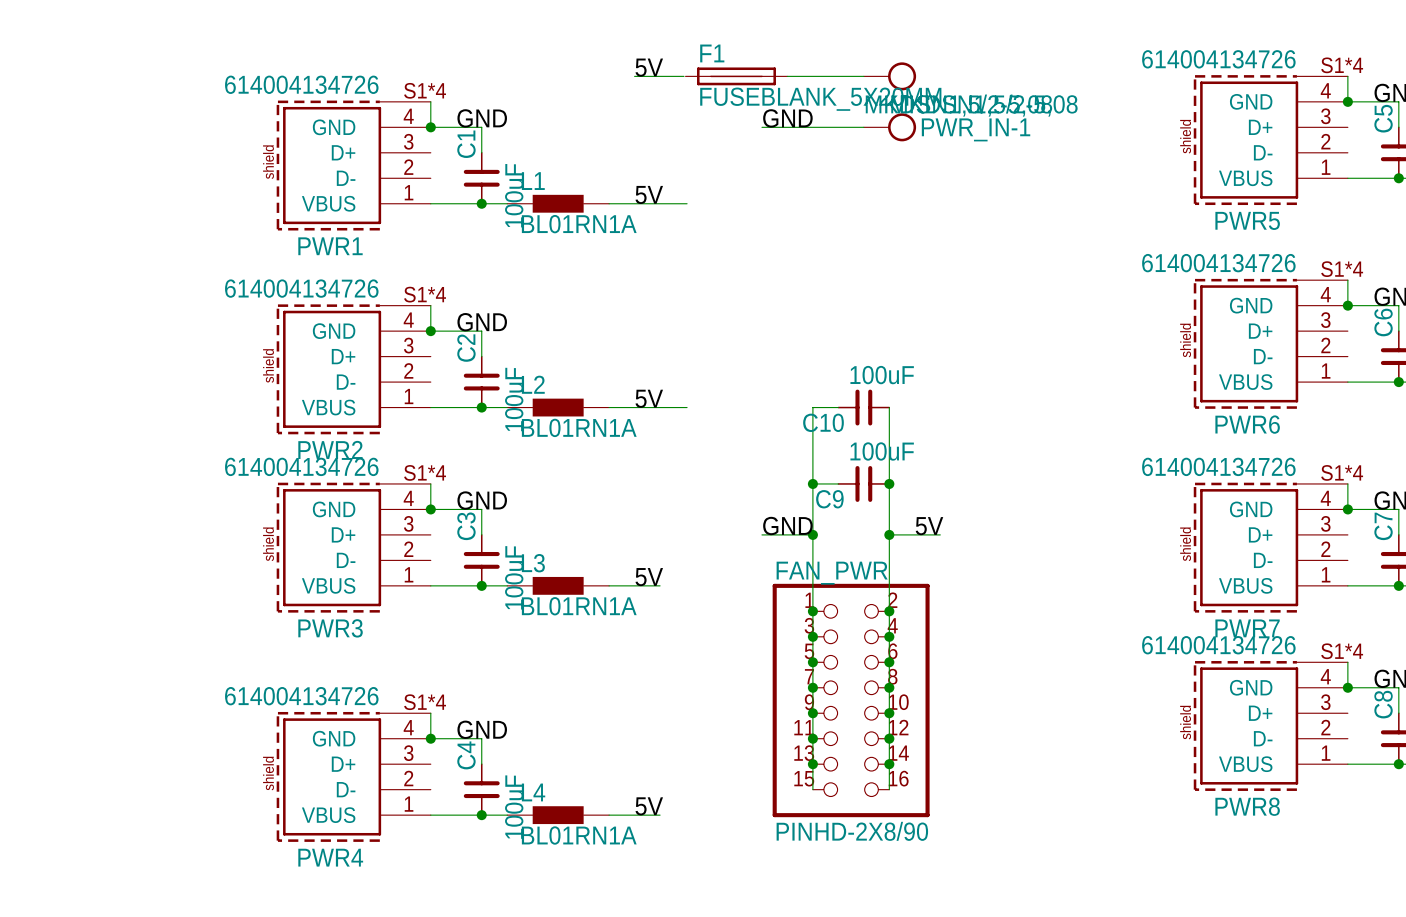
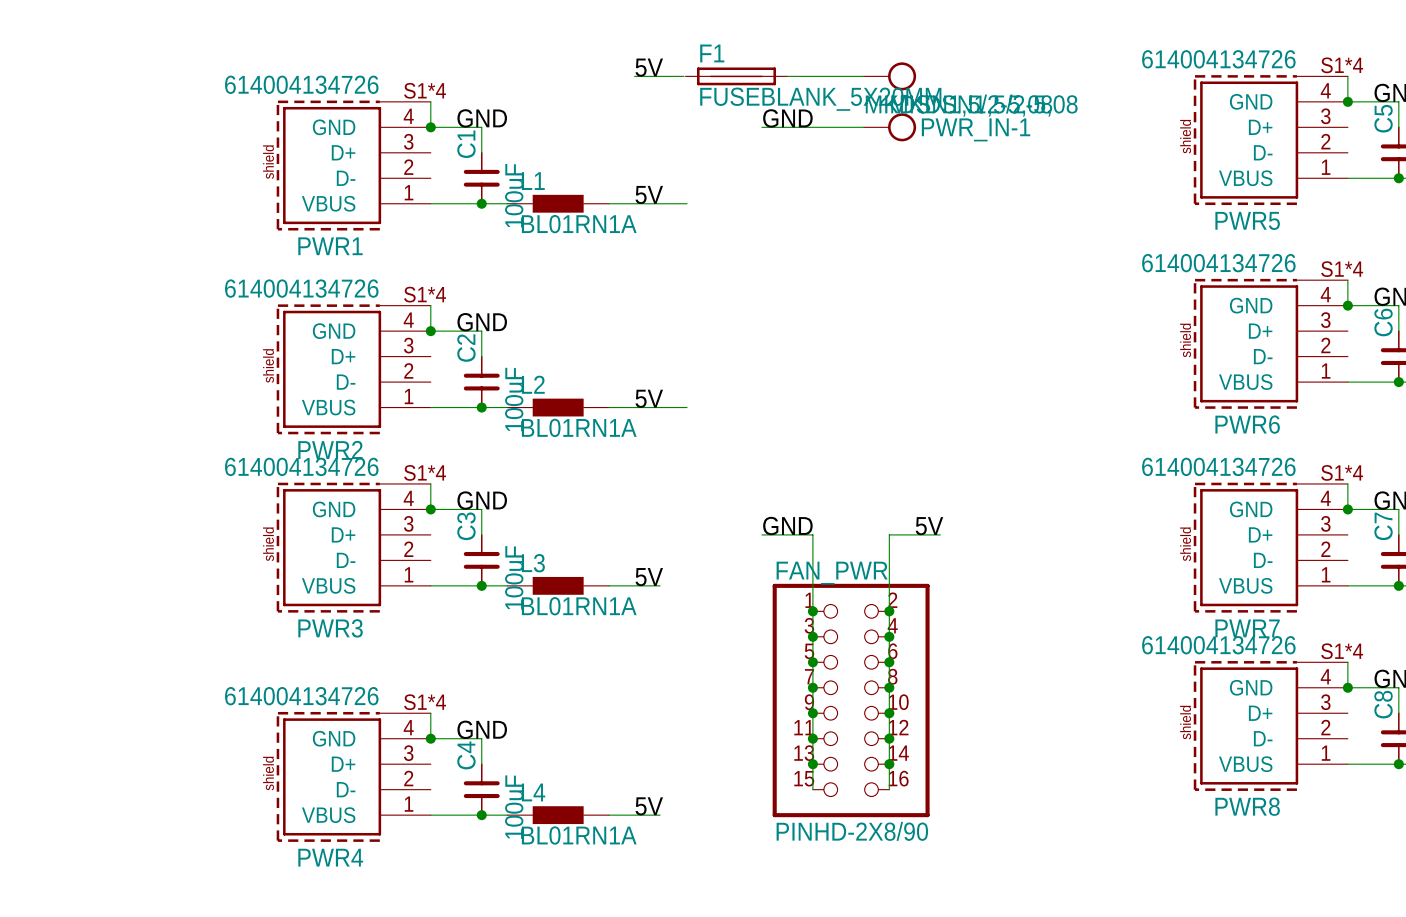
wire: (838, 407) (812, 407) (812, 534) -> none
C10: 100uF (863, 407) -> none
wire: (889, 407) (889, 534) -> none
wire: (812, 483) (838, 483) -> none
junction: (812, 483) -> none
C9: 100uF (863, 483) -> none
junction: (889, 483) -> none
junction: (812, 534) -> none
junction: (889, 534) -> none

